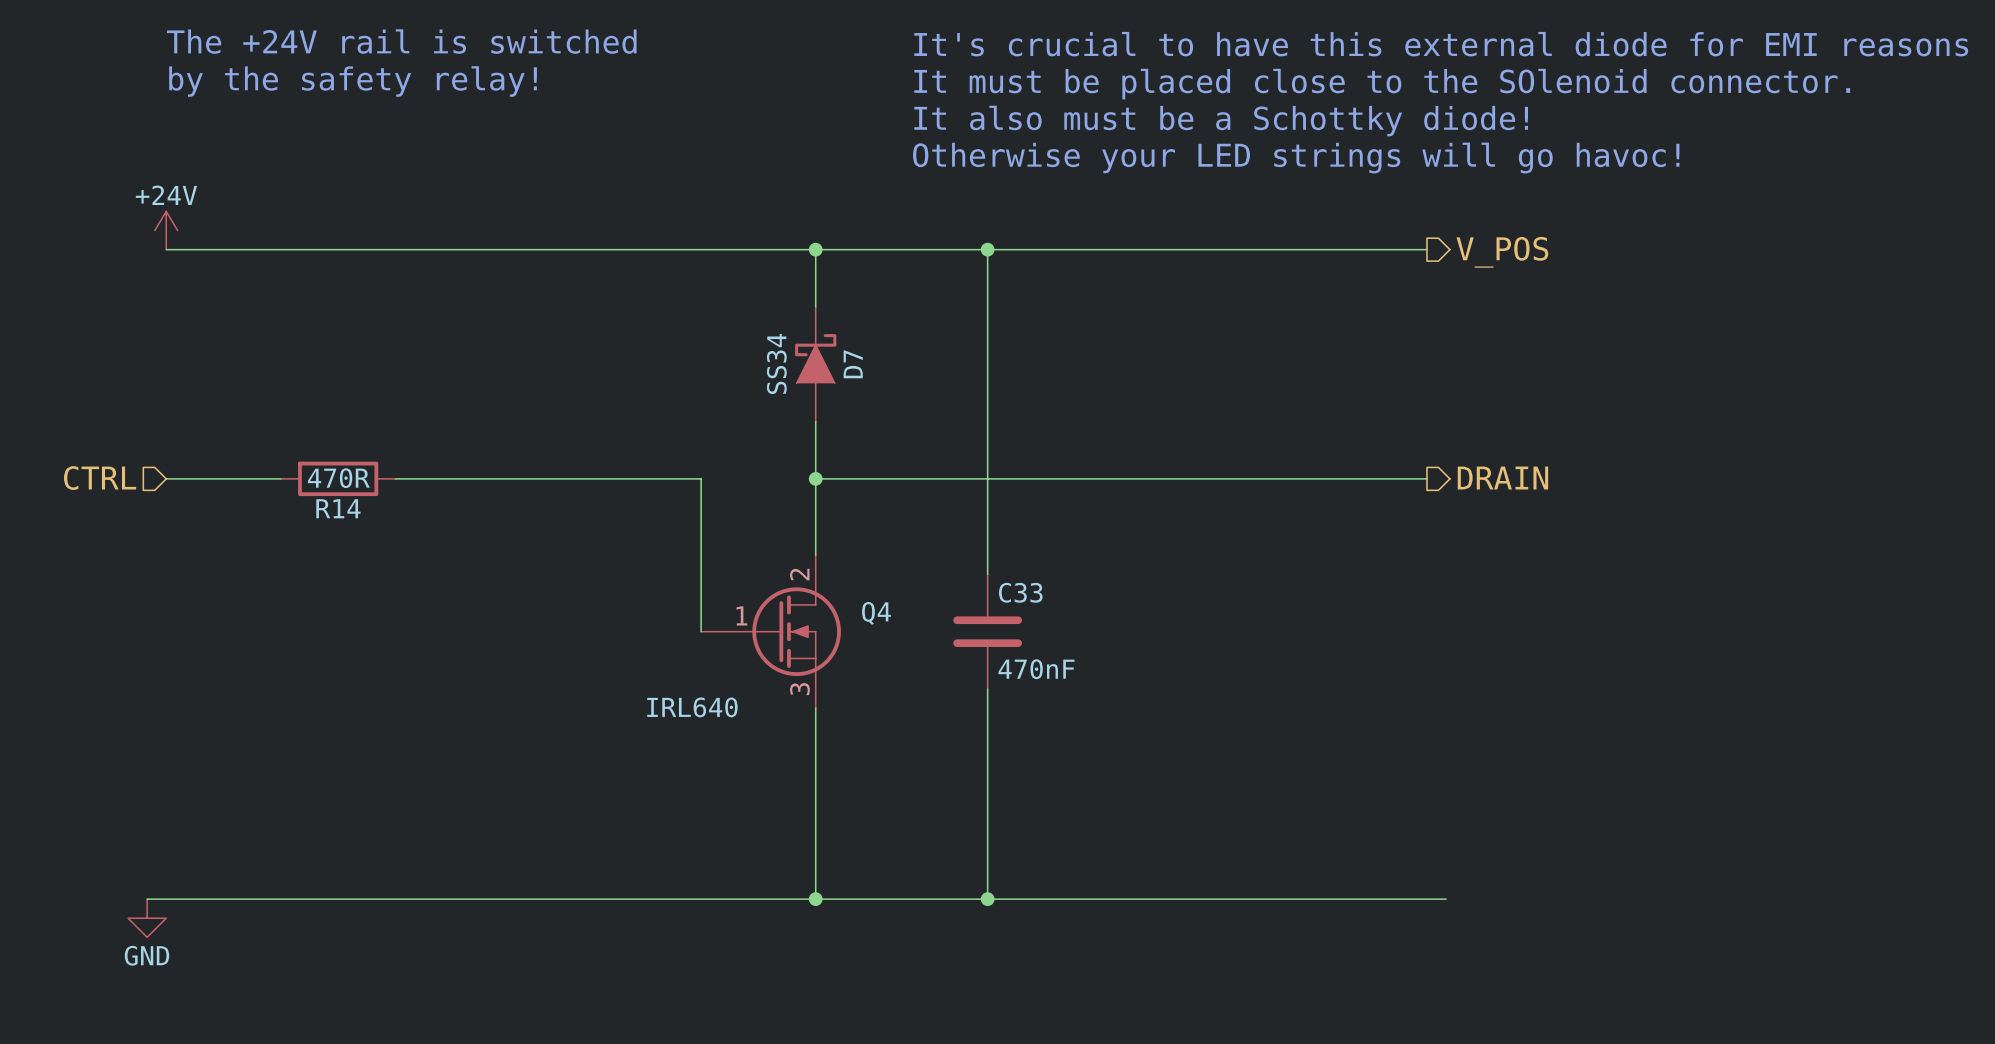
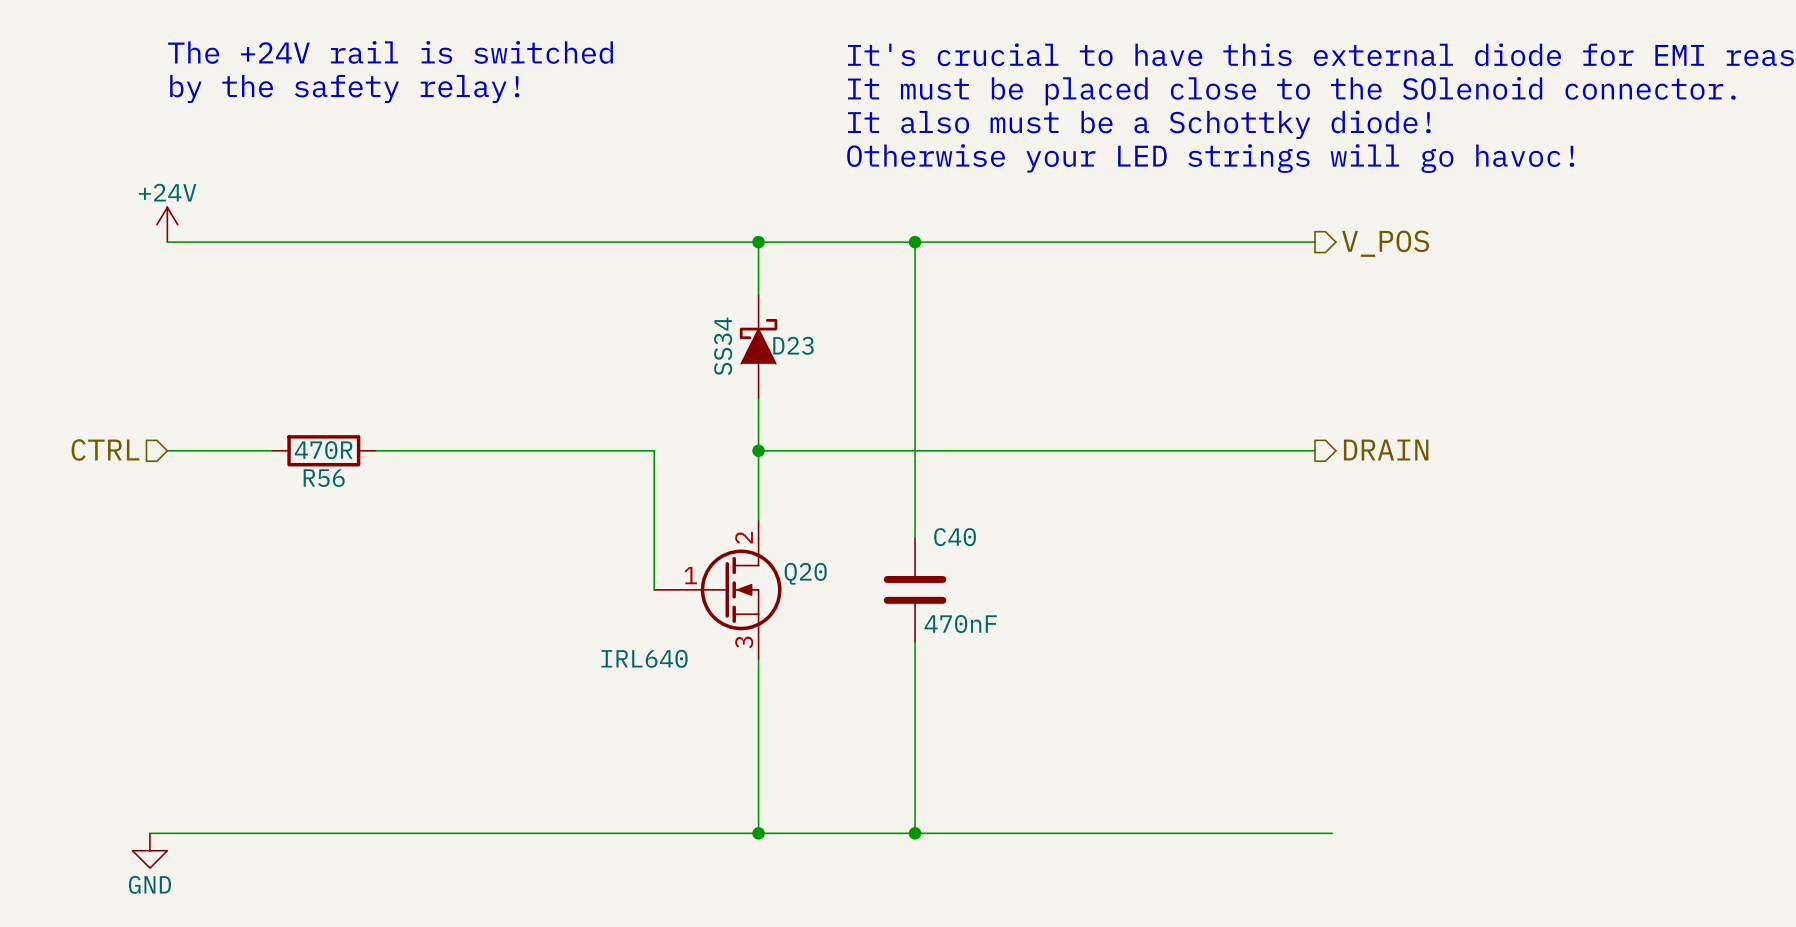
D7 name: D7 (853, 364) -> D23 (793, 345)
R14 name: R14 (338, 508) -> R56 (324, 478)
C33 name: C33 (1020, 592) -> C40 (955, 537)
Q4 name: Q4 (876, 613) -> Q20 (805, 573)

